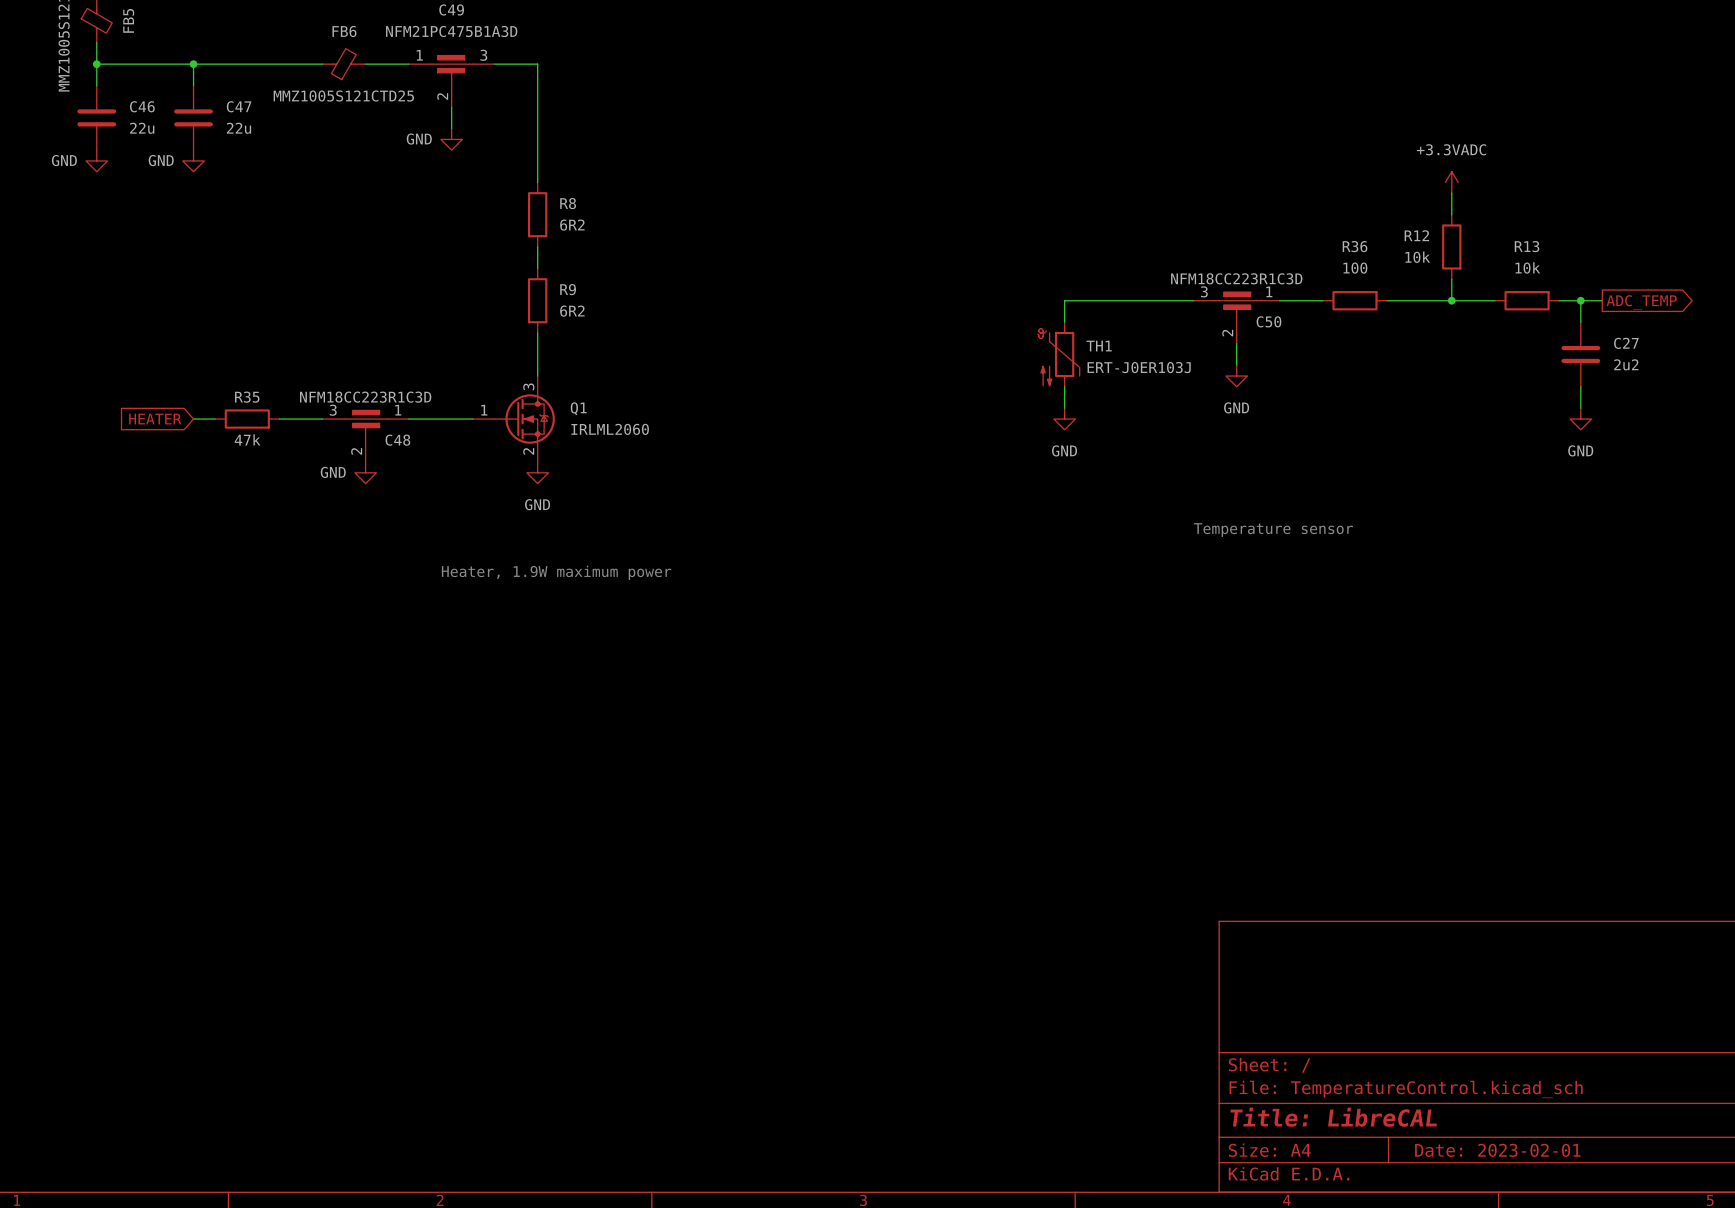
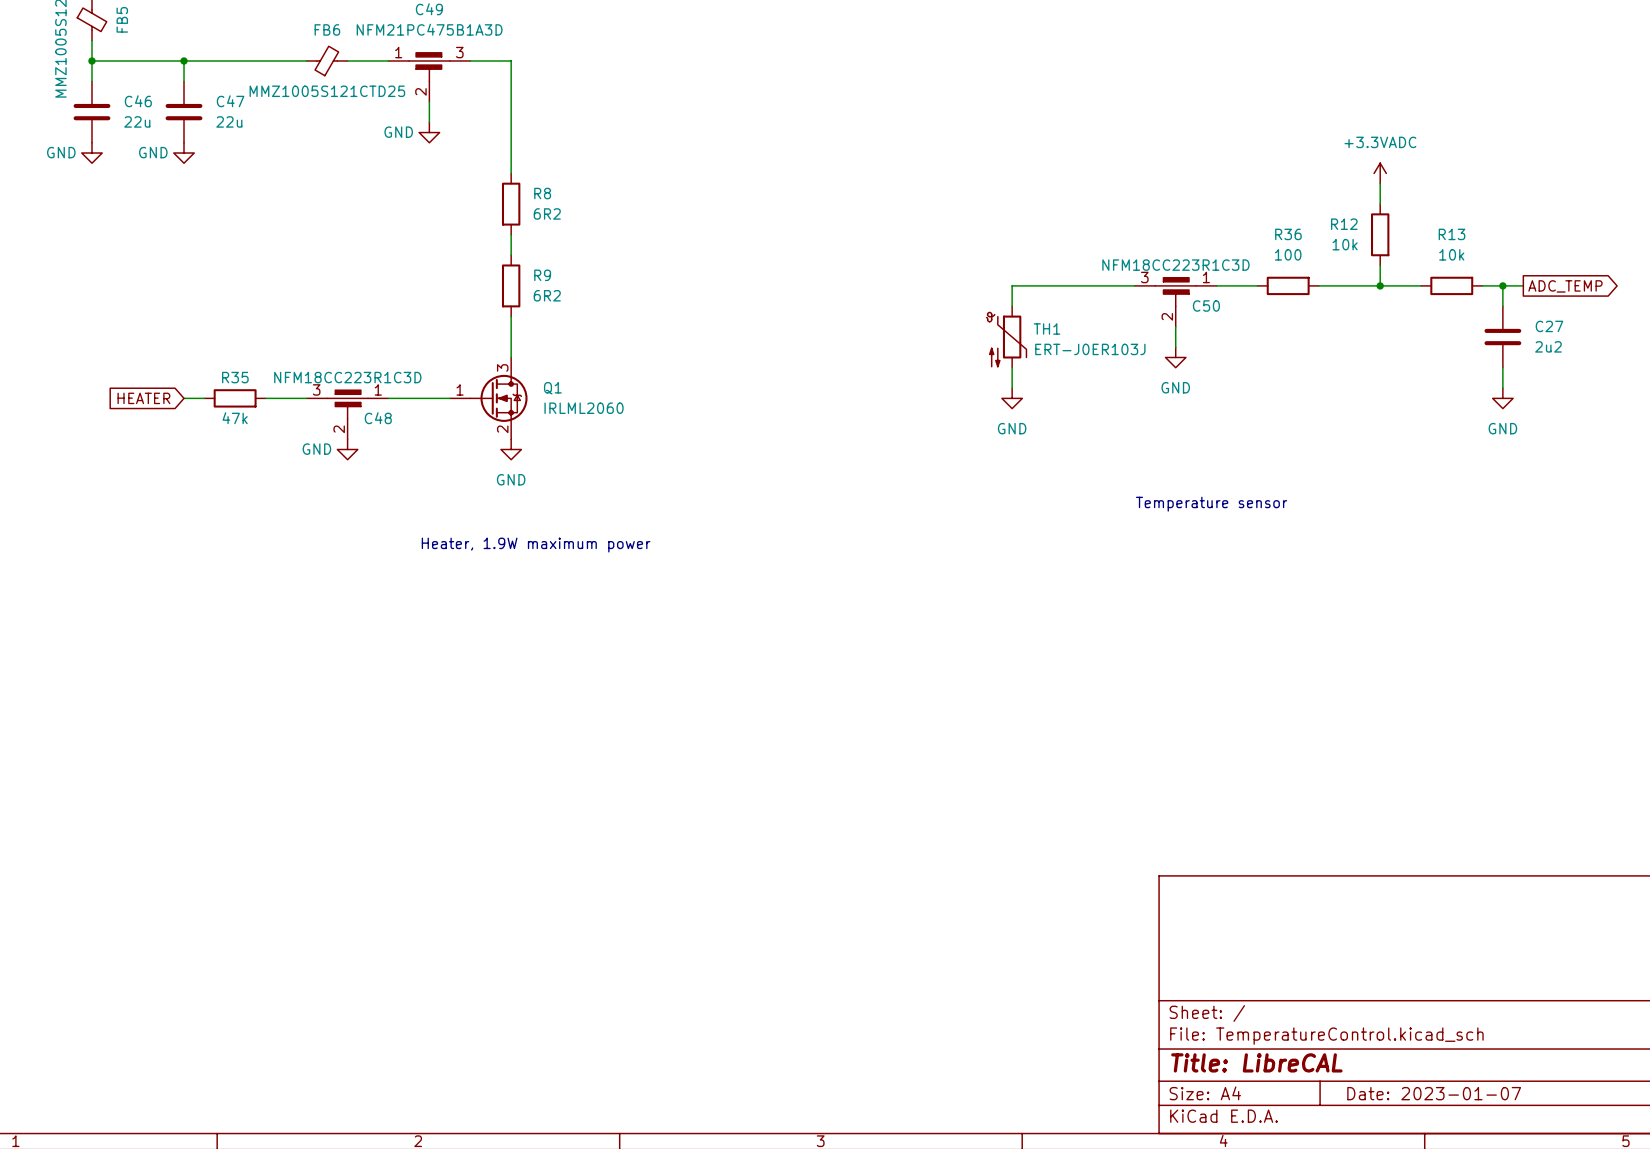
title block: Date: 2023-02-01 (1497, 1150) -> Date: 2023-01-07 (1434, 1093)

